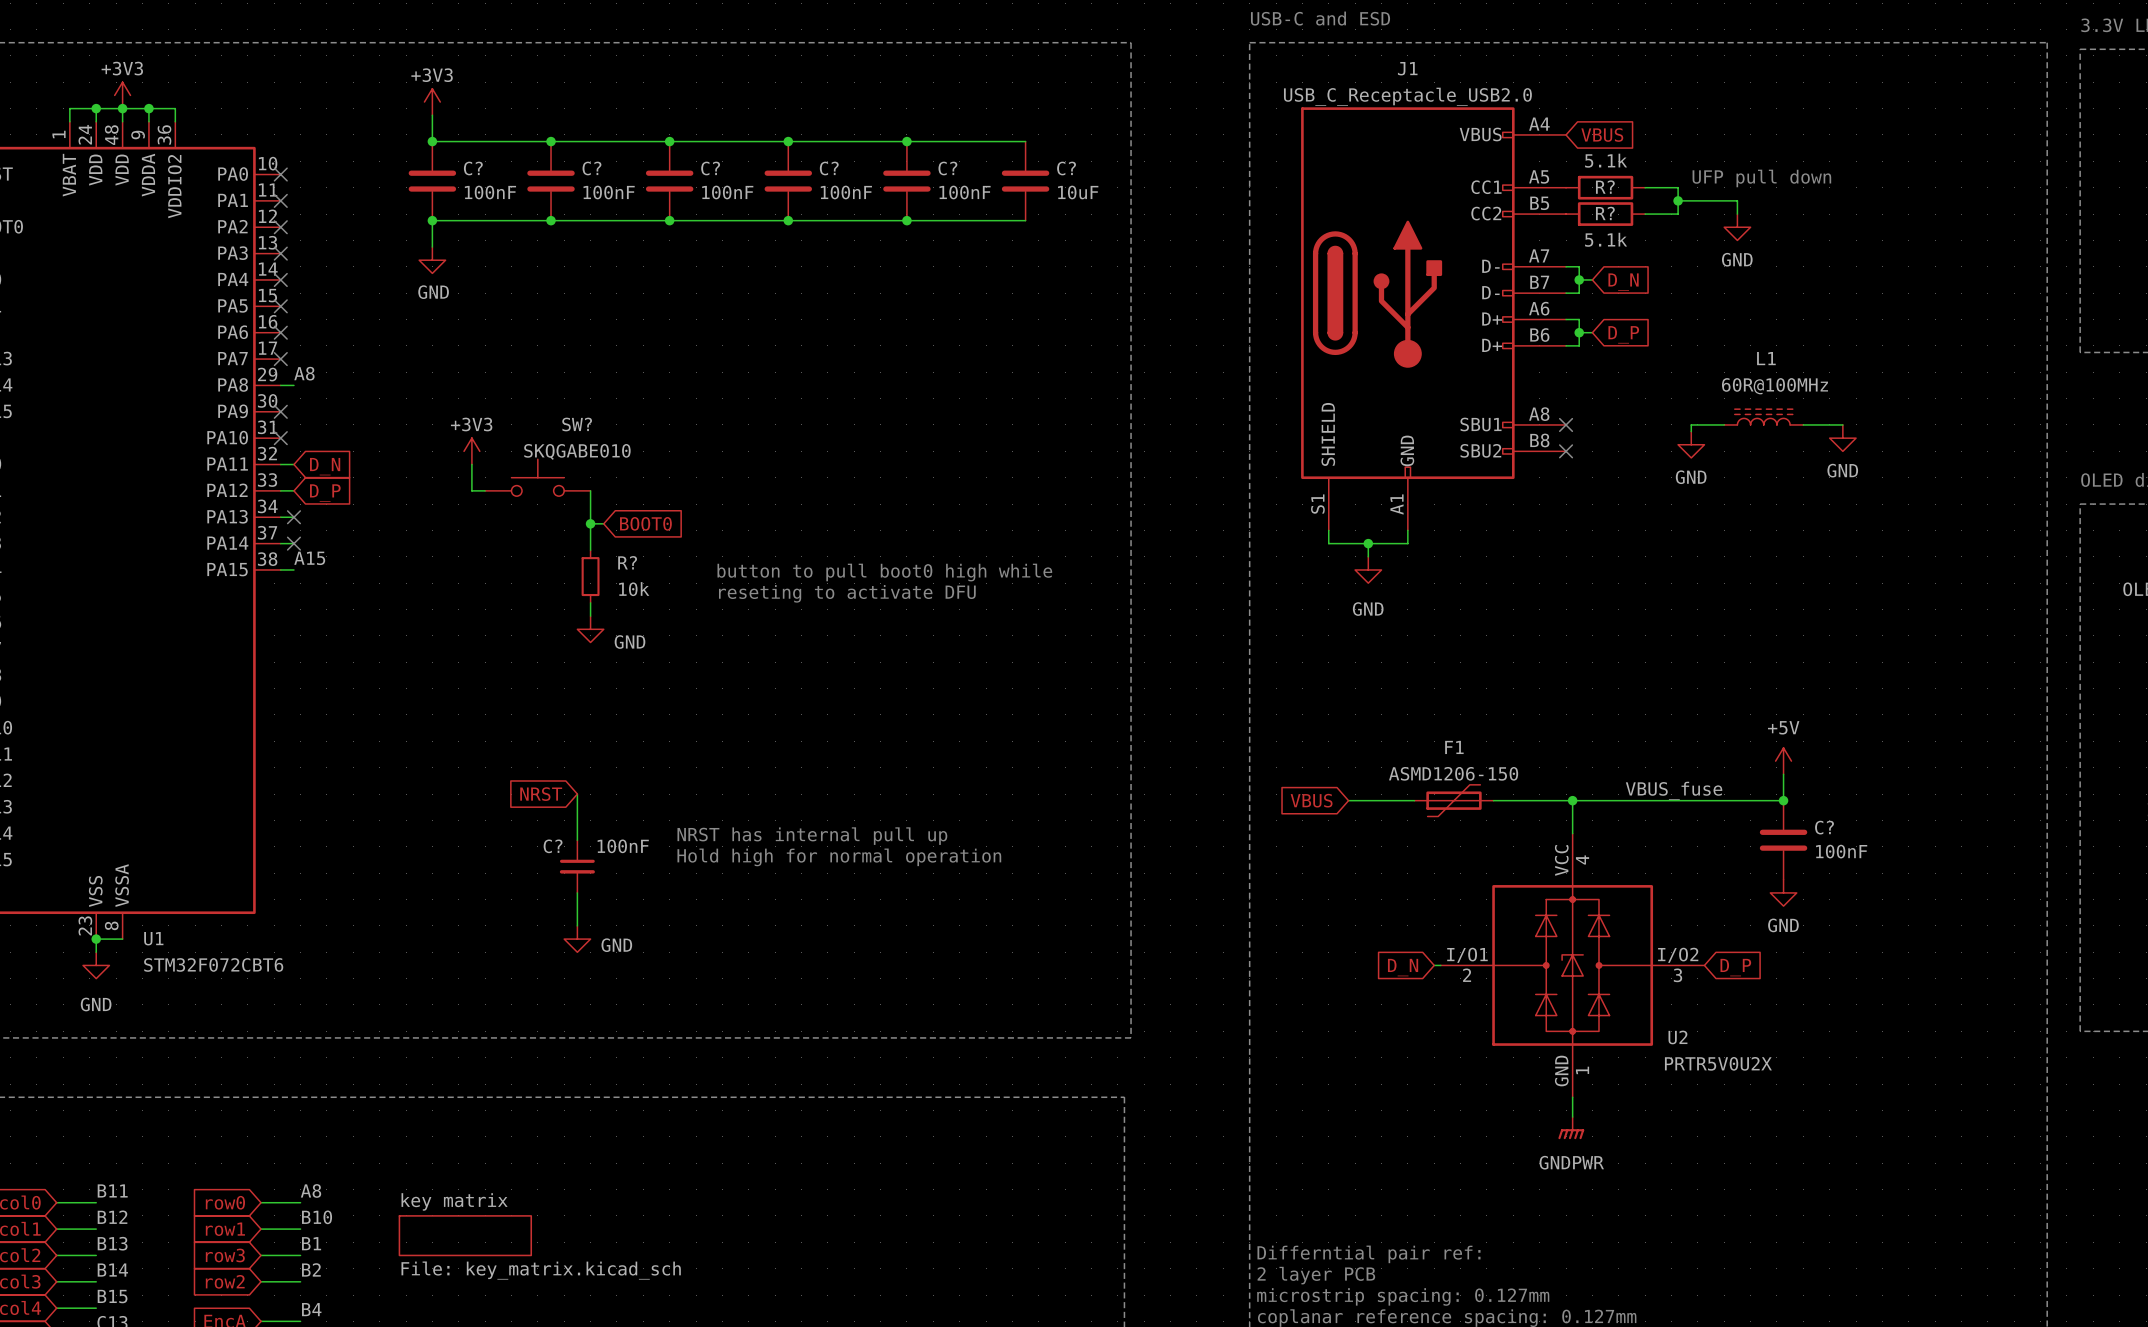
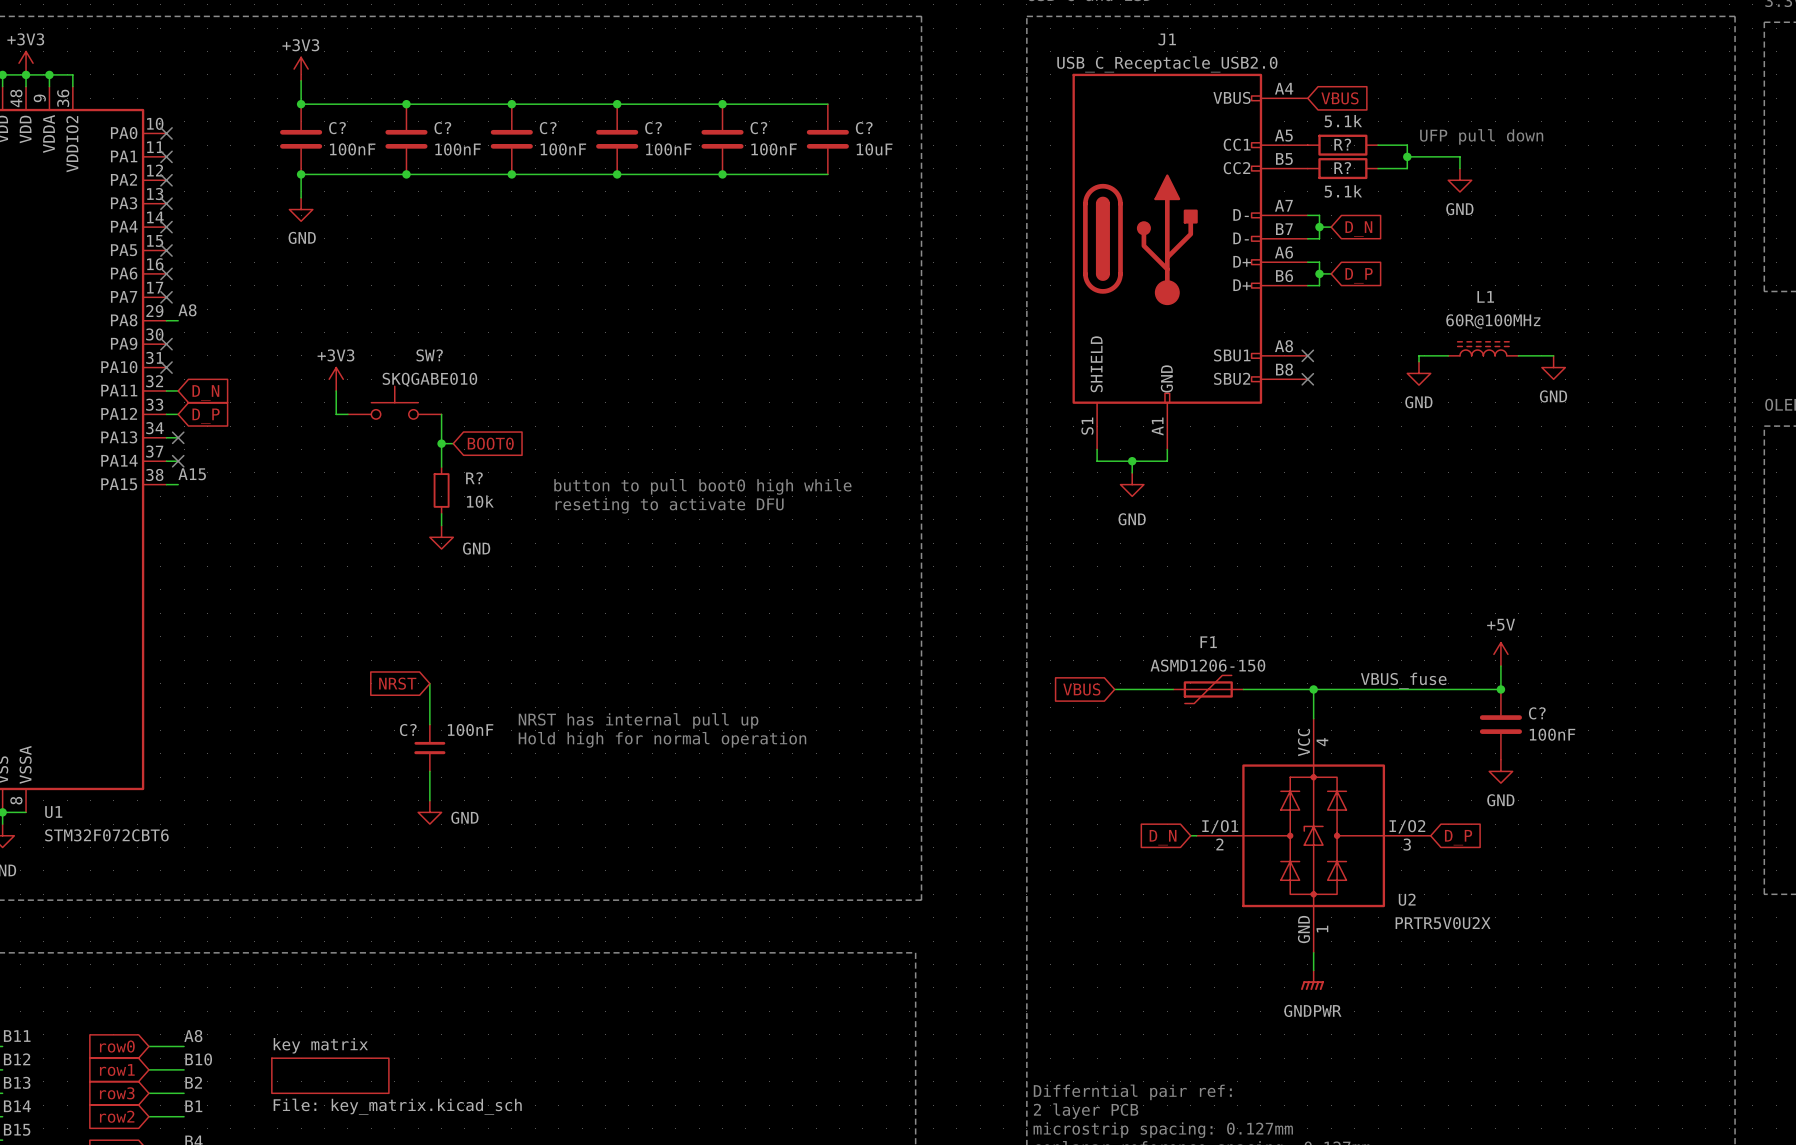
label: B1 (311, 1243) -> B2 (193, 1082)
label: B2 (311, 1269) -> B1 (193, 1106)

